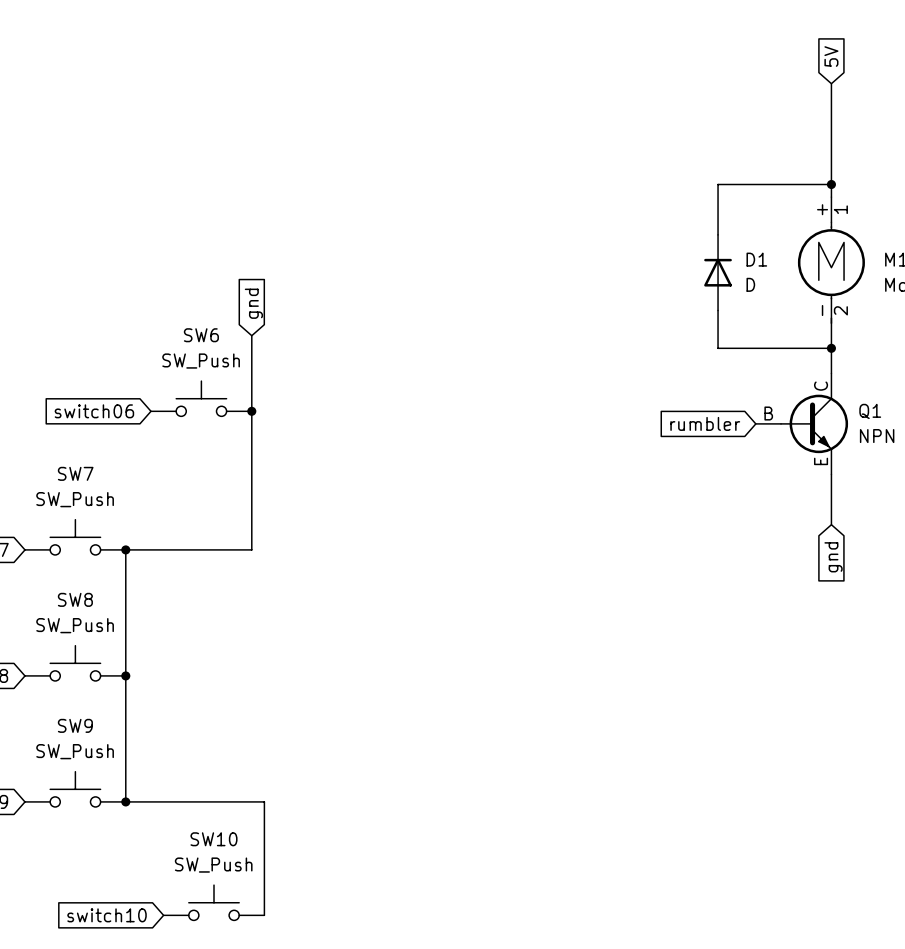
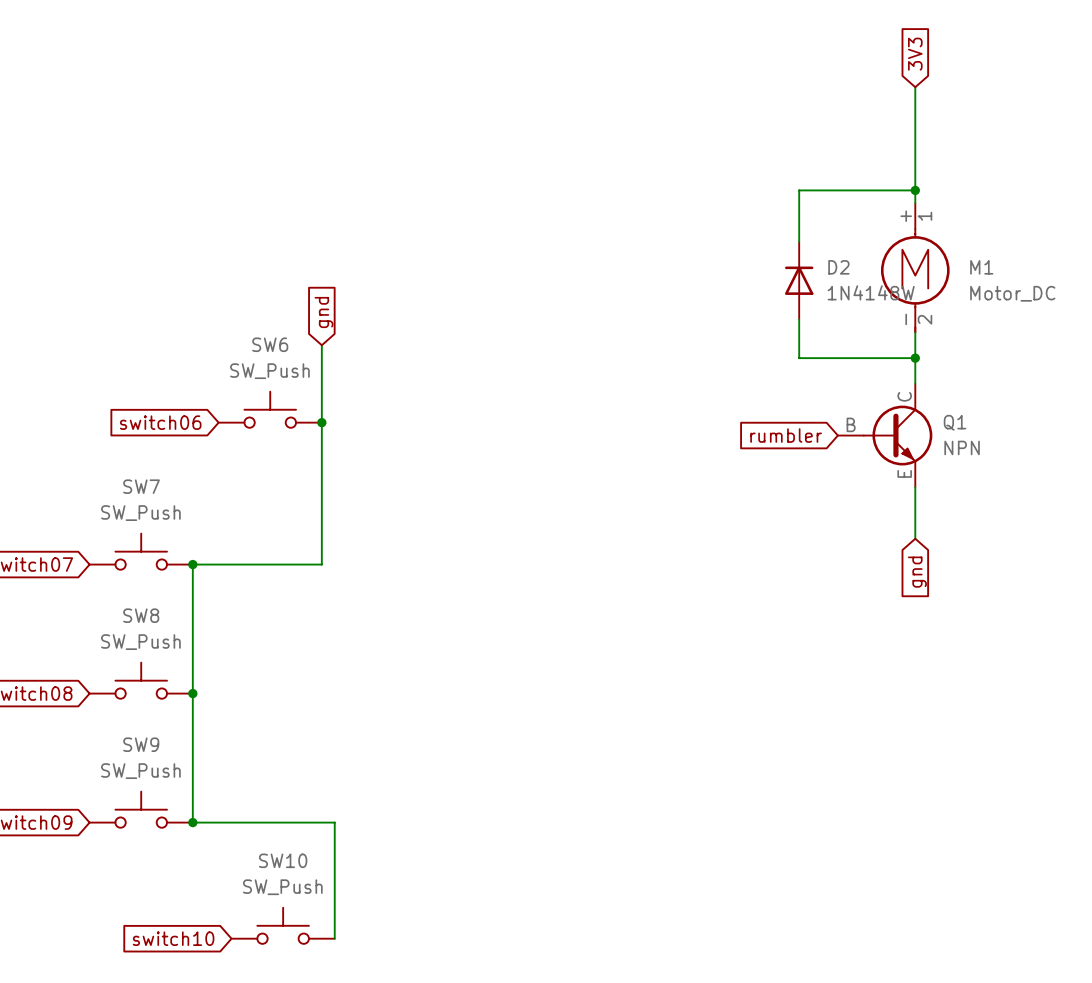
global label: 5V (831, 56) -> 3V3 (915, 54)
D1 name: D1 (756, 259) -> D2 (838, 267)
D1 value: D (750, 284) -> 1N4148W (871, 292)

